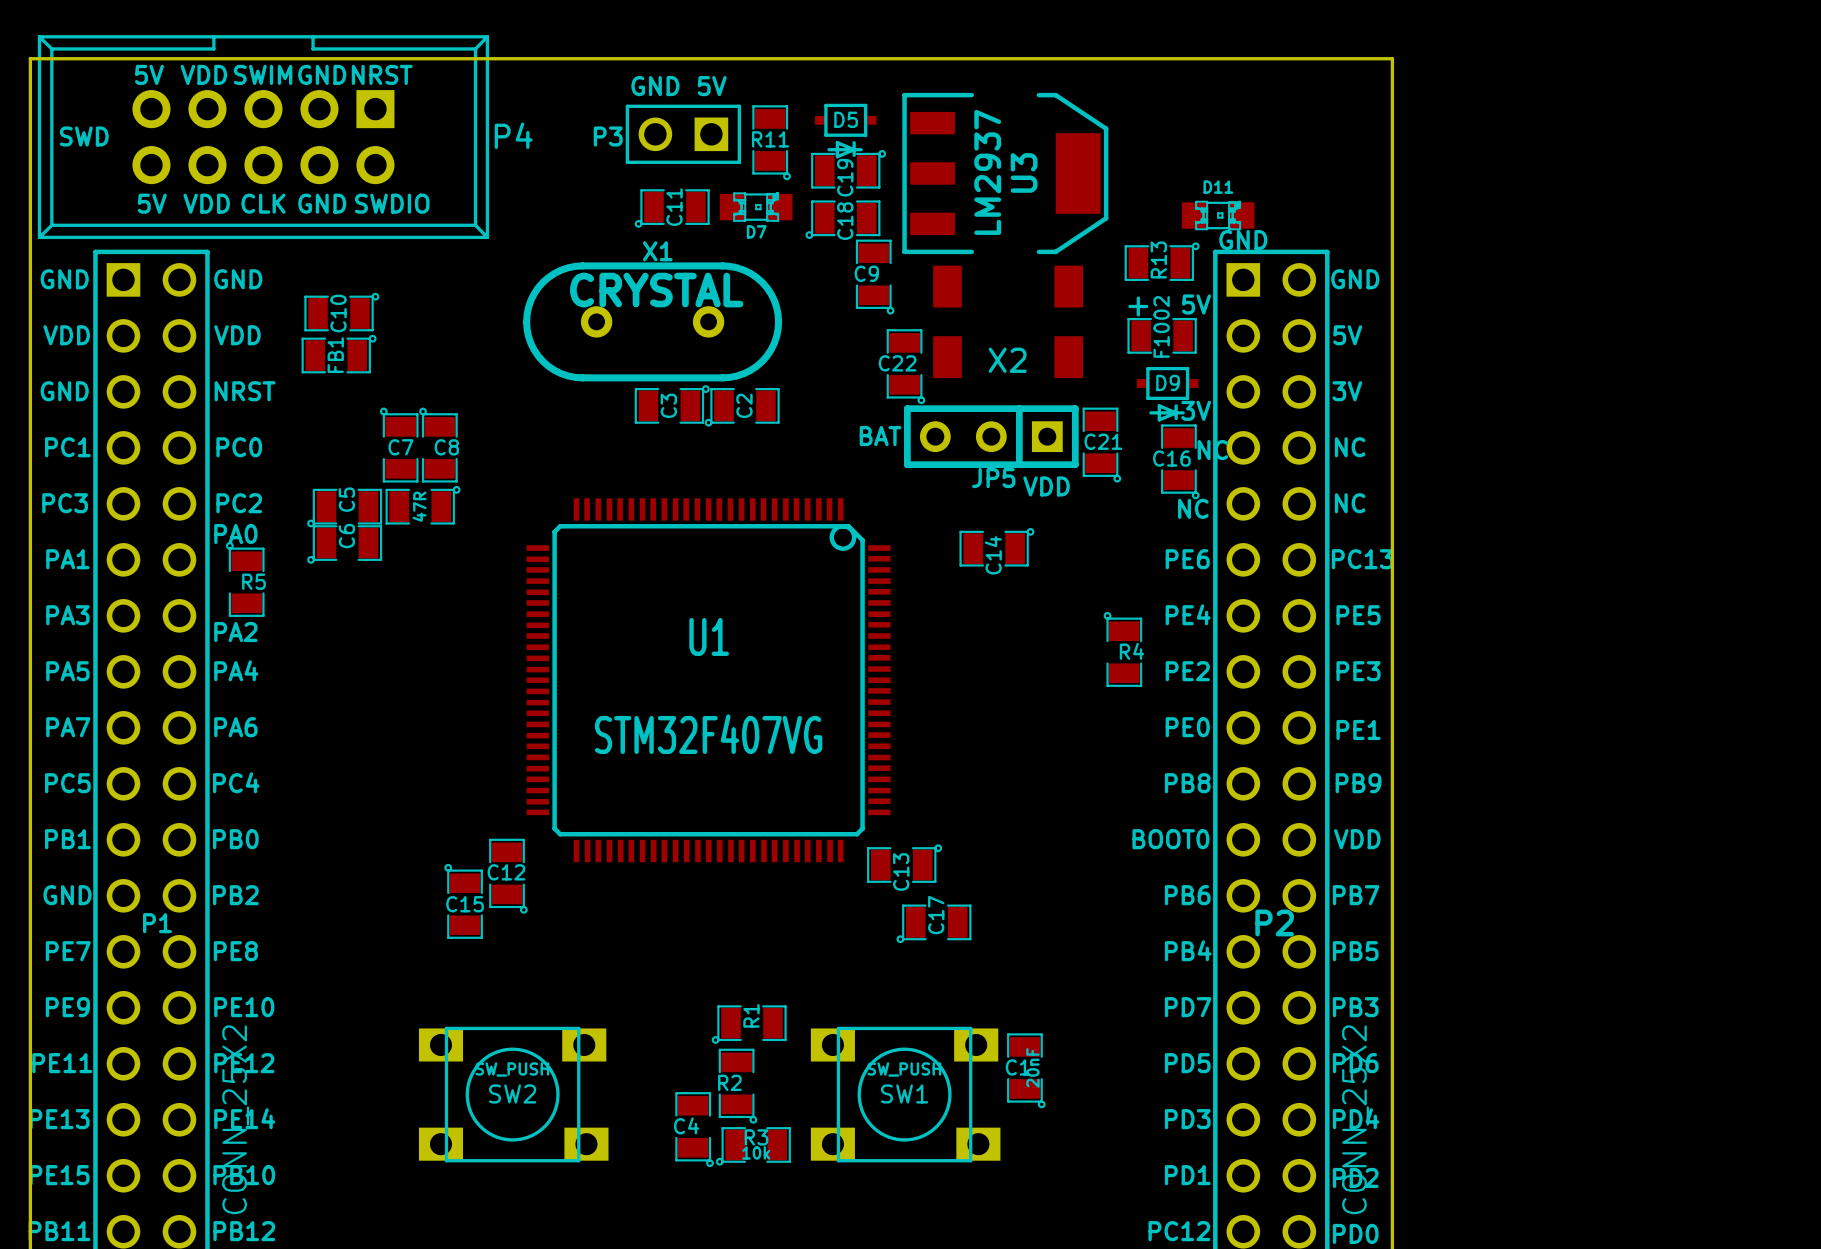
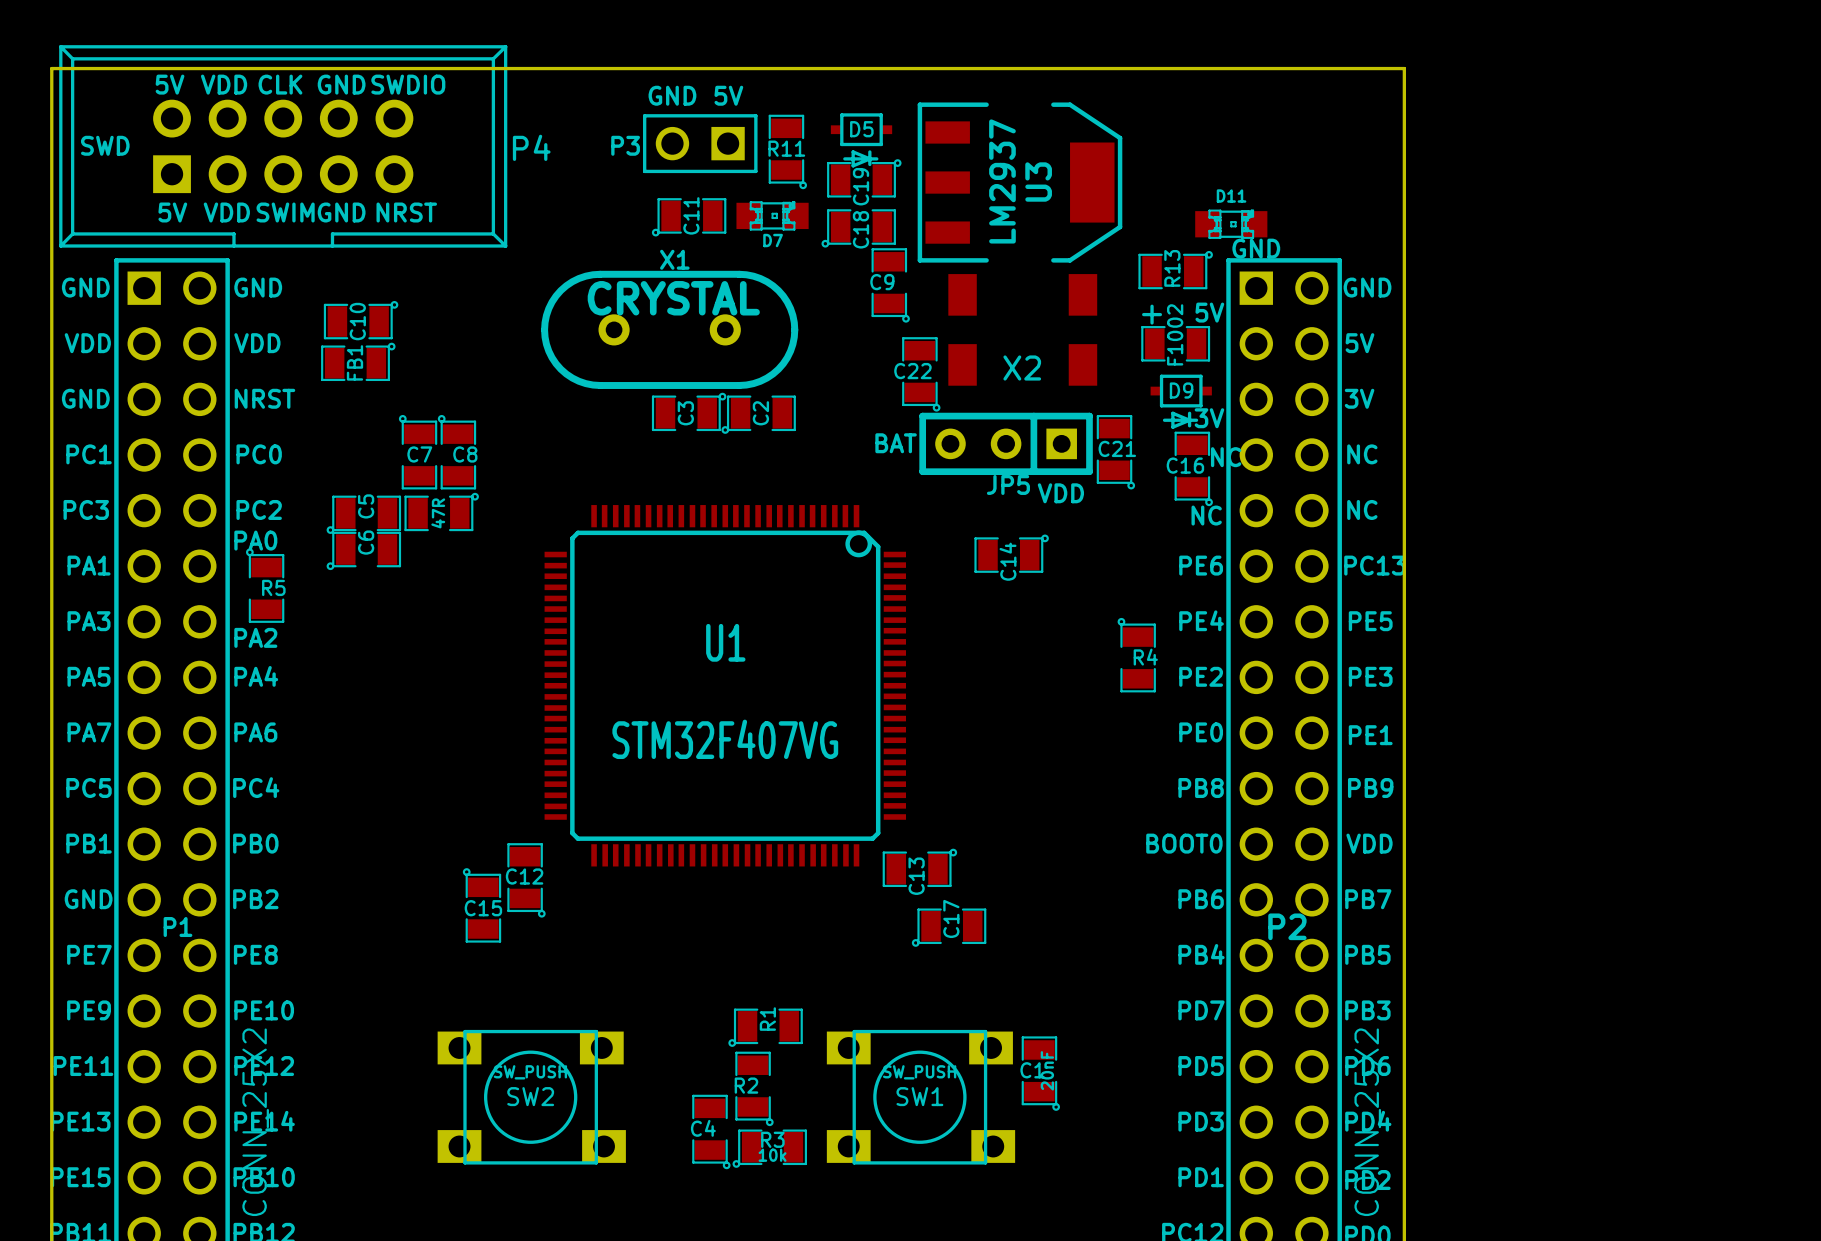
text: SWIM (263, 74) -> CLK (280, 84)
text: NRST (382, 74) -> SWDIO (408, 84)
P4 rotation: 0° (263, 137) -> 180° (283, 146)
text: CLK (263, 203) -> SWIM (285, 212)
text: SWDIO (392, 203) -> NRST (406, 212)

